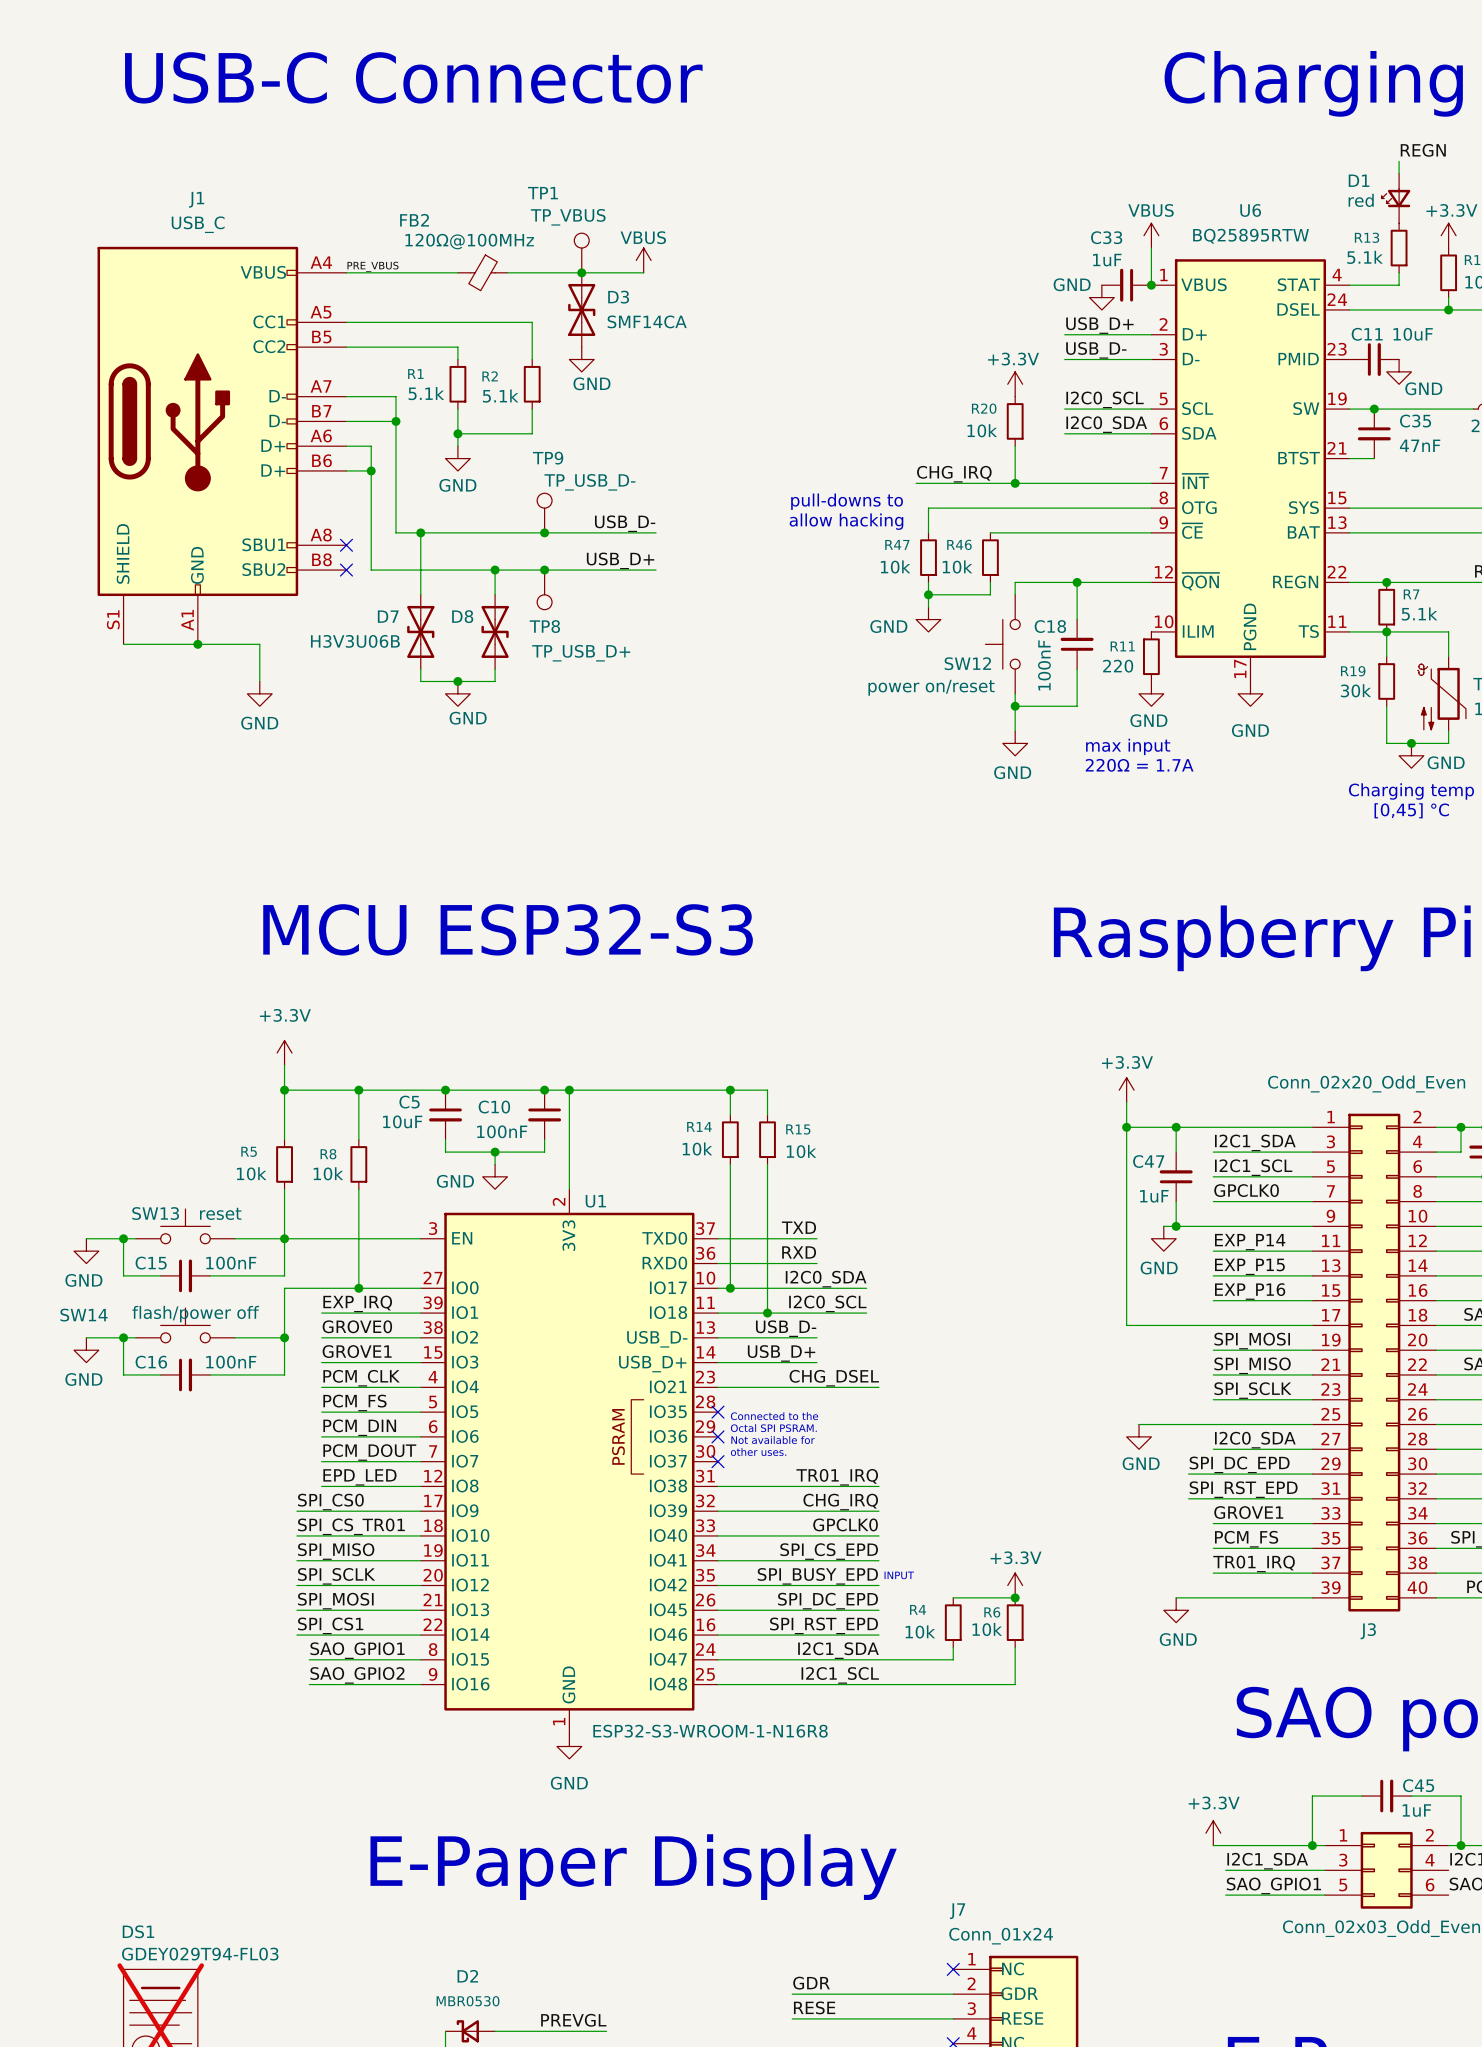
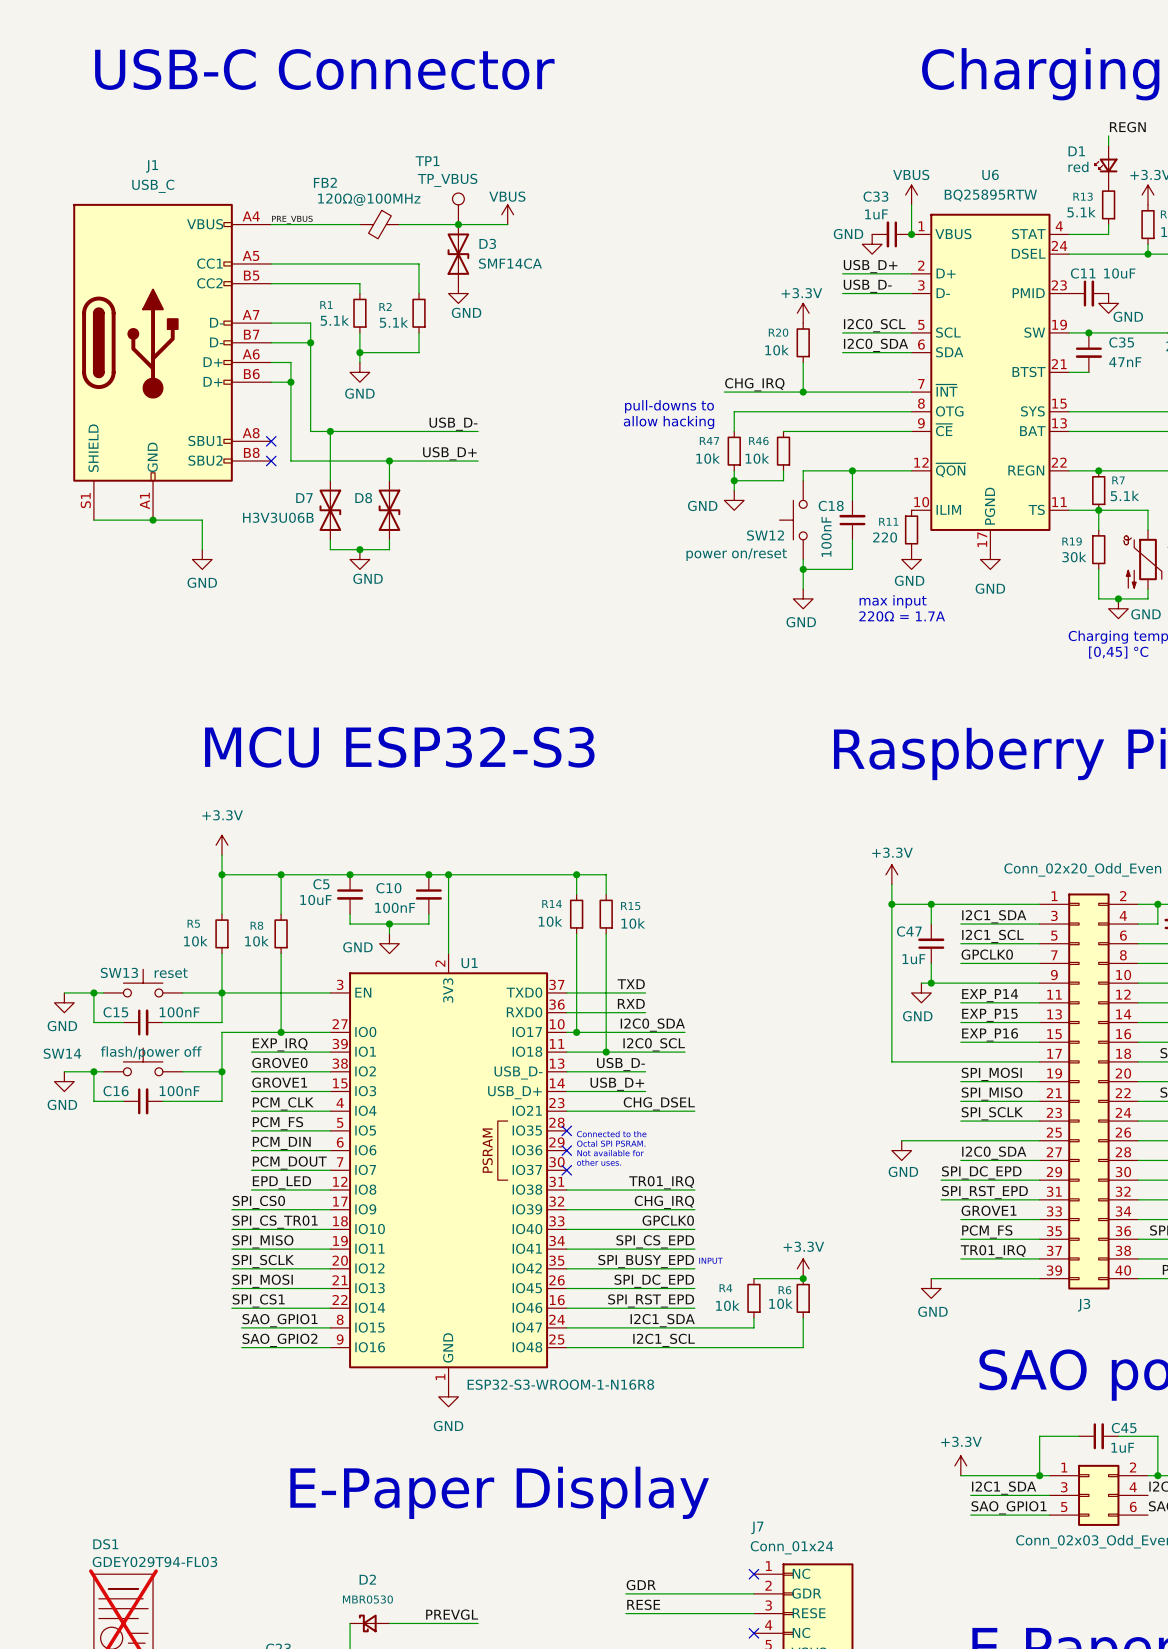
TP9: TP_USB_D- (544, 513) -> none
label position: USB_D- (625, 523) -> USB_D- (453, 424)
junction: (544, 532) -> none
wire: (606, 532) (656, 532) -> none
label position: USB_D+ (620, 560) -> USB_D+ (449, 453)
junction: (544, 570) -> none
wire: (606, 570) (656, 570) -> none
TP8: TP_USB_D+ (544, 589) -> none

